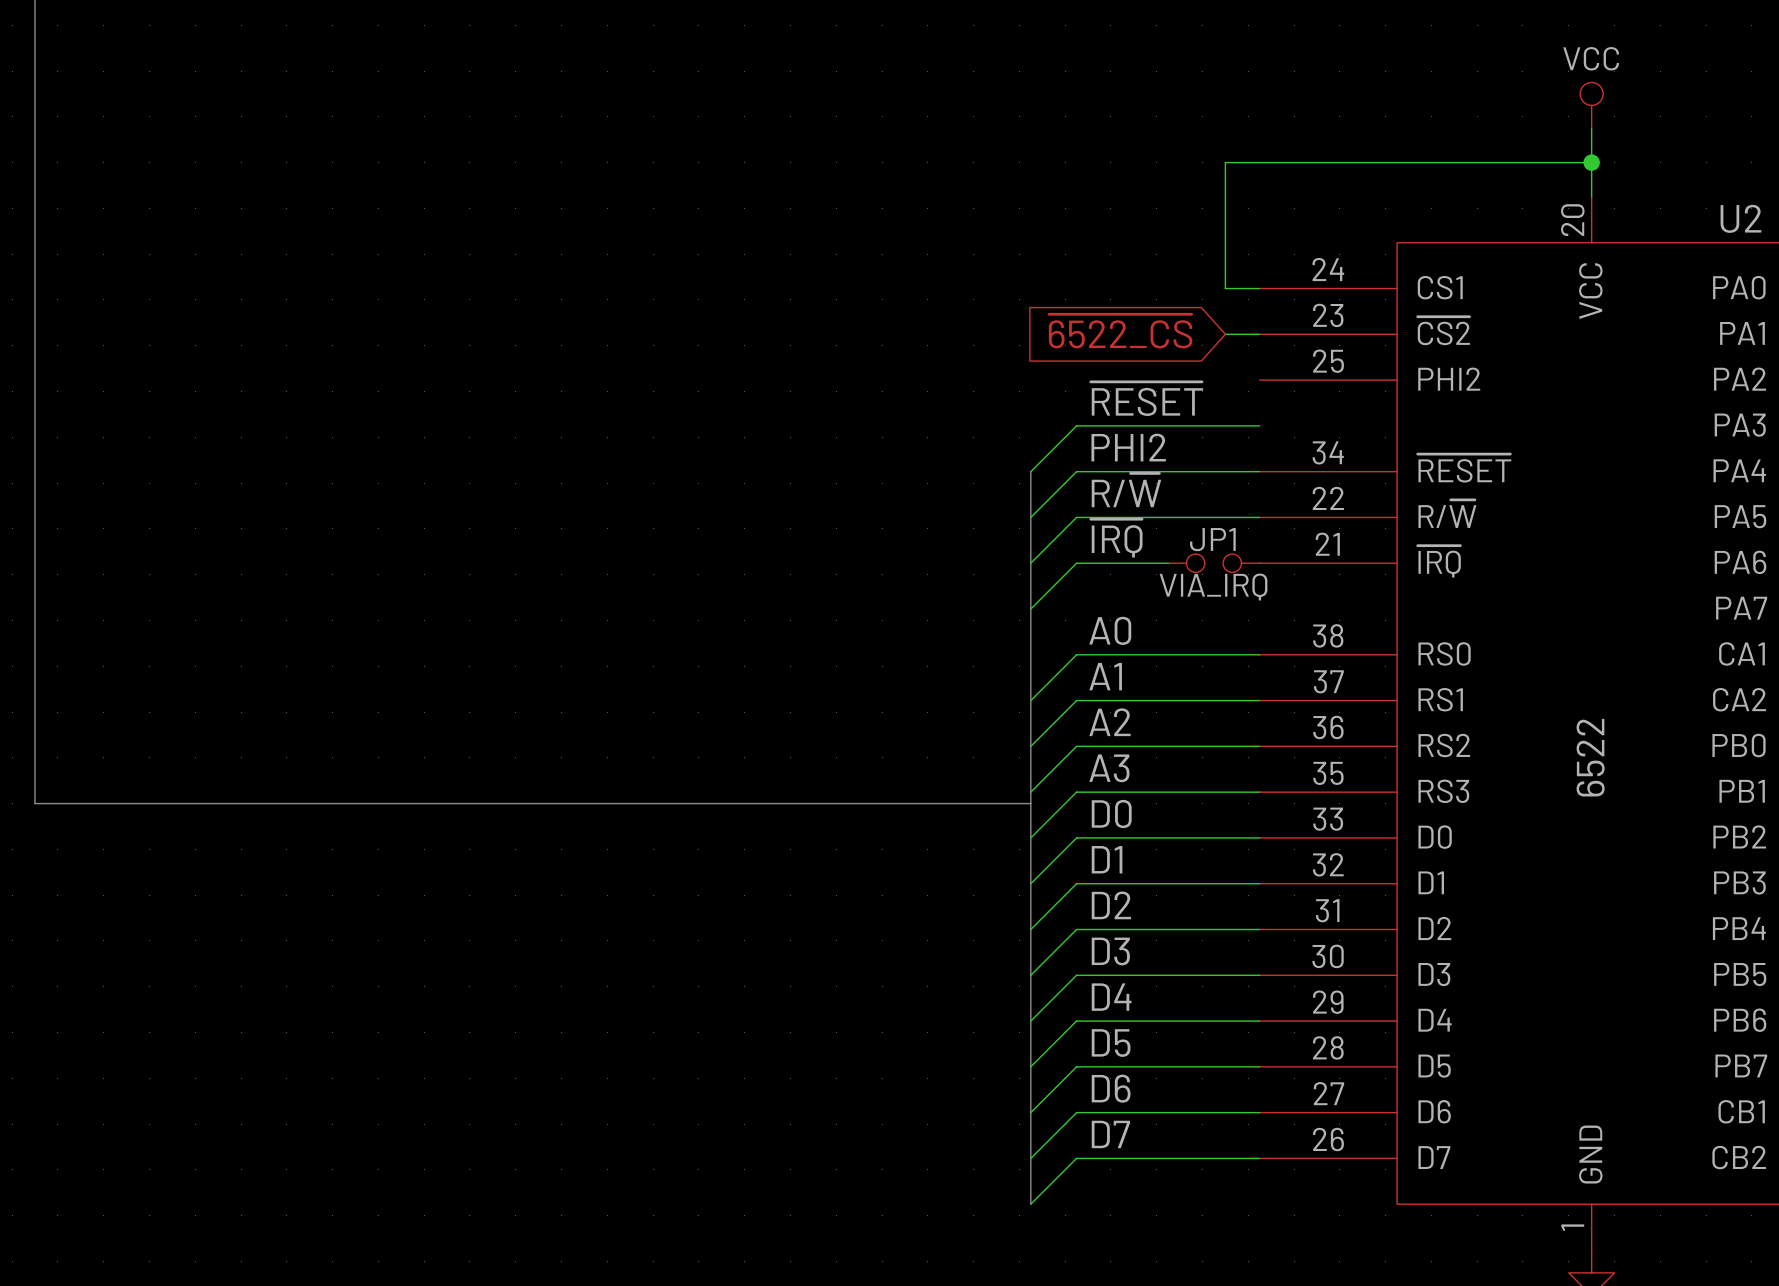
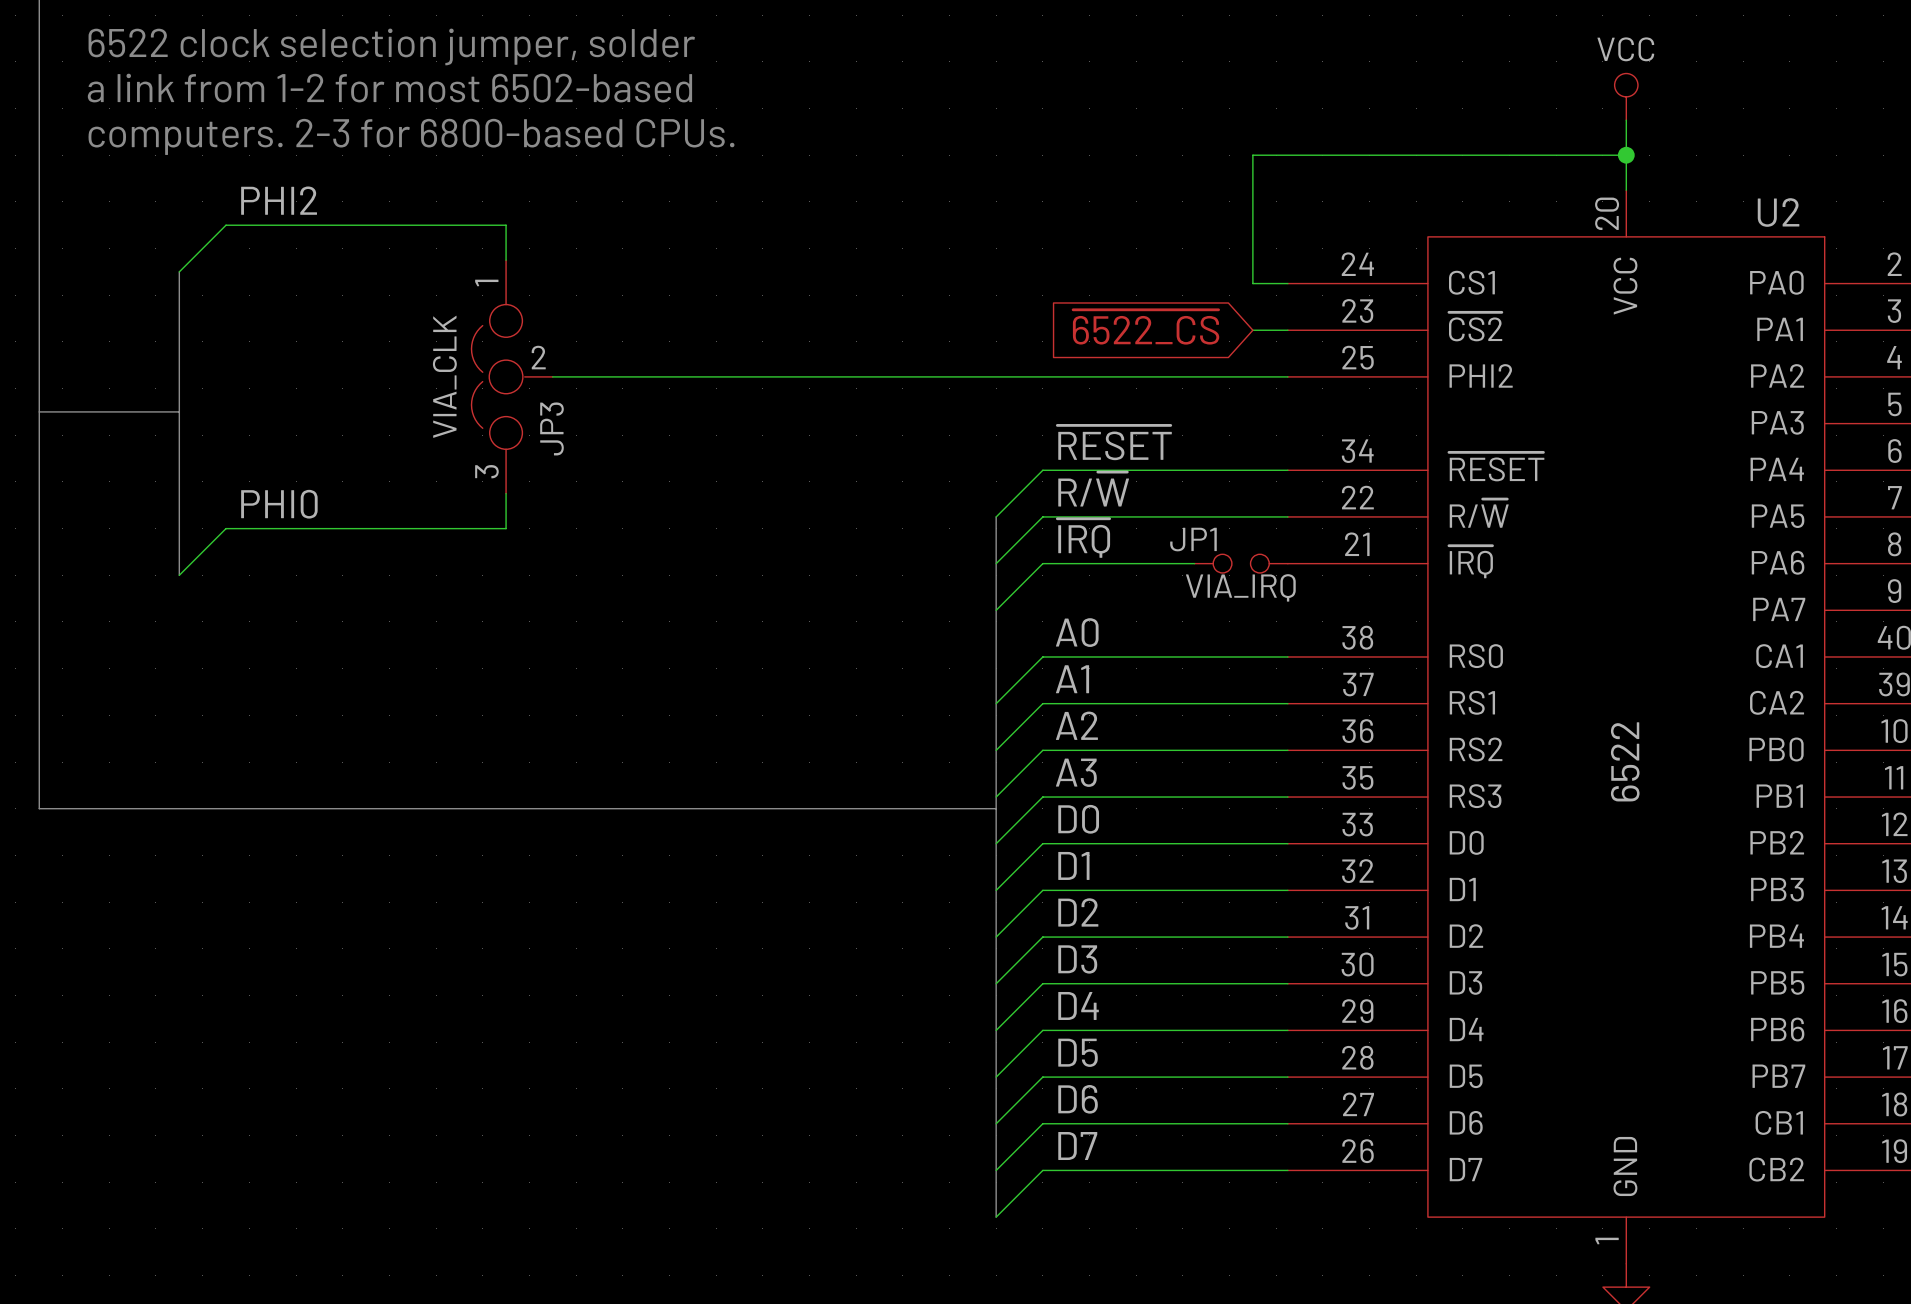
text: none -> 6522 clock selection jumper, solder (391, 46)
text: none -> a link from 1-2 for most 6502-based (389, 88)
text: none -> computers. 2-3 for 6800-based CPUs. (411, 136)
label: none -> PHI2 (279, 200)
wire: none -> (506, 260) (506, 225) (225, 225) (179, 271)
bus: none -> (179, 271) (179, 575)
JP3: none -> VIA_CLK (512, 376)
wire: none -> (552, 376) (1287, 376)
label position: ~{RESET} (1146, 398) -> ~{RESET} (1114, 442)
bus: none -> (39, 411) (179, 411)
wire: (1259, 425) (1076, 425) (1030, 471) -> none
label: PHI2 (1128, 447) -> none
bus: (1030, 471) (1030, 1204) -> none
wire: (1076, 471) (1030, 517) -> (1101, 470) (1042, 470) (996, 516)
label position: R/~{W} (1126, 490) -> R/~{W} (1093, 489)
wire: none -> (506, 493) (506, 528) (225, 528) (179, 575)
label: none -> PHI0 (279, 504)
bus: none -> (996, 516) (996, 1217)
wire: (1076, 517) (1030, 563) -> (1101, 516) (1042, 516) (996, 563)
label position: ~{IRQ} (1116, 538) -> ~{IRQ} (1083, 538)
JP1 name position: JP1 (1212, 539) -> JP1 (1193, 539)
wire: (1076, 563) (1030, 609) -> (1101, 563) (1042, 563) (996, 610)
label position: A0 (1110, 630) -> A0 (1077, 632)
wire: (1076, 654) (1030, 700) -> (1101, 656) (1042, 656) (996, 703)
label position: A1 (1105, 676) -> A1 (1072, 679)
wire: (1076, 700) (1030, 746) -> (1101, 703) (1042, 703) (996, 750)
label position: A2 (1109, 722) -> A2 (1076, 725)
wire: (1076, 746) (1030, 792) -> (1101, 750) (1042, 750) (996, 797)
label position: A3 (1109, 768) -> A3 (1076, 772)
wire: (1076, 792) (1030, 837) -> (1101, 797) (1042, 797) (996, 843)
bus: (973, 803) (1030, 803) -> none
label position: D0 (1111, 813) -> D0 (1078, 819)
wire: (1076, 837) (1030, 883) -> (1101, 843) (1042, 843) (996, 890)
label position: D1 (1107, 859) -> D1 (1073, 865)
wire: (1076, 883) (1030, 929) -> (1101, 890) (1042, 890) (996, 937)
label position: D2 (1111, 905) -> D2 (1078, 912)
wire: (1076, 929) (1030, 975) -> (1101, 937) (1042, 937) (996, 983)
label position: D3 (1110, 951) -> D3 (1077, 959)
wire: (1076, 975) (1030, 1021) -> (1101, 983) (1042, 983) (996, 1030)
label position: D4 (1111, 997) -> D4 (1078, 1005)
wire: (1076, 1021) (1030, 1066) -> (1101, 1030) (1042, 1030) (996, 1077)
label position: D5 (1111, 1043) -> D5 (1078, 1052)
wire: (1076, 1066) (1030, 1112) -> (1101, 1077) (1042, 1077) (996, 1123)
label position: D6 (1111, 1088) -> D6 (1078, 1099)
wire: (1076, 1112) (1030, 1158) -> (1101, 1123) (1042, 1123) (996, 1170)
label position: D7 (1110, 1134) -> D7 (1077, 1146)
wire: (1076, 1158) (1030, 1204) -> (1101, 1170) (1042, 1170) (996, 1217)

